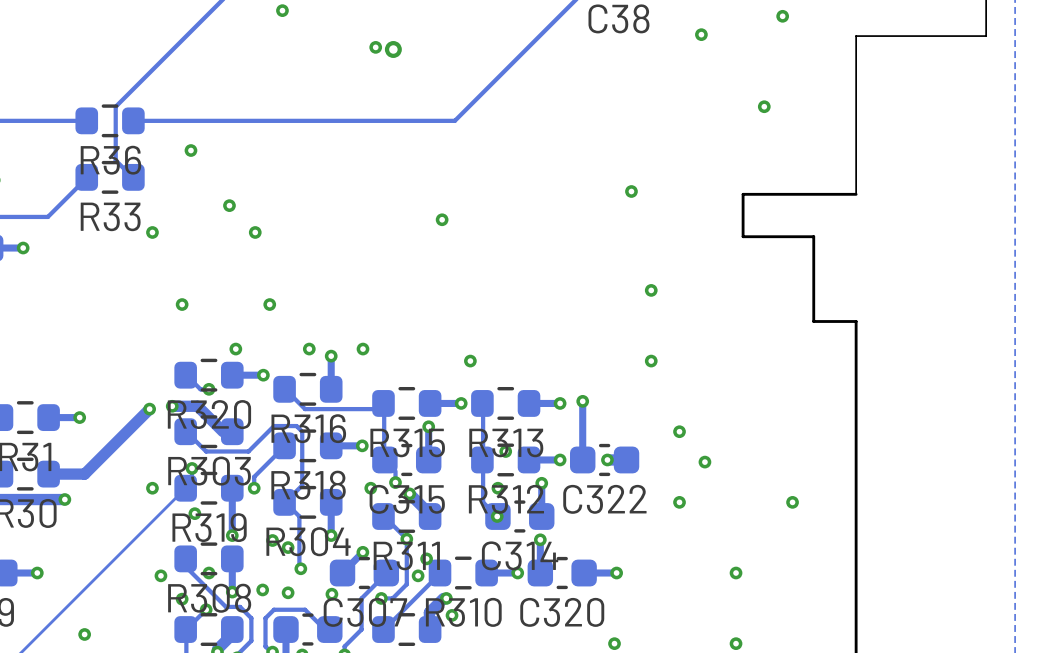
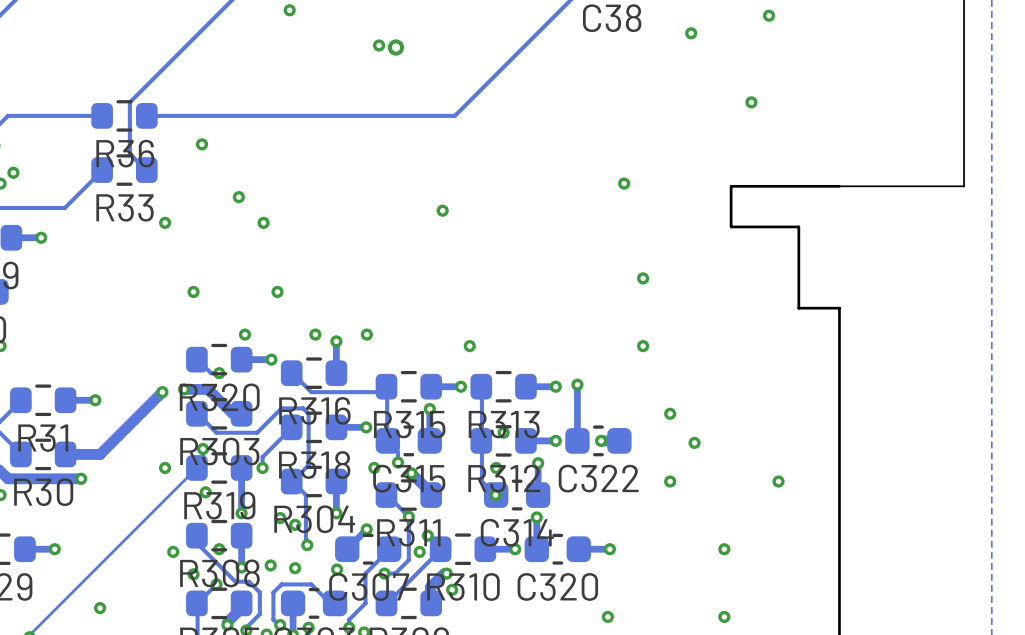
board edge: (986, 36) (856, 36) (856, 194) -> (964, 34) (964, 186) (839, 186)

